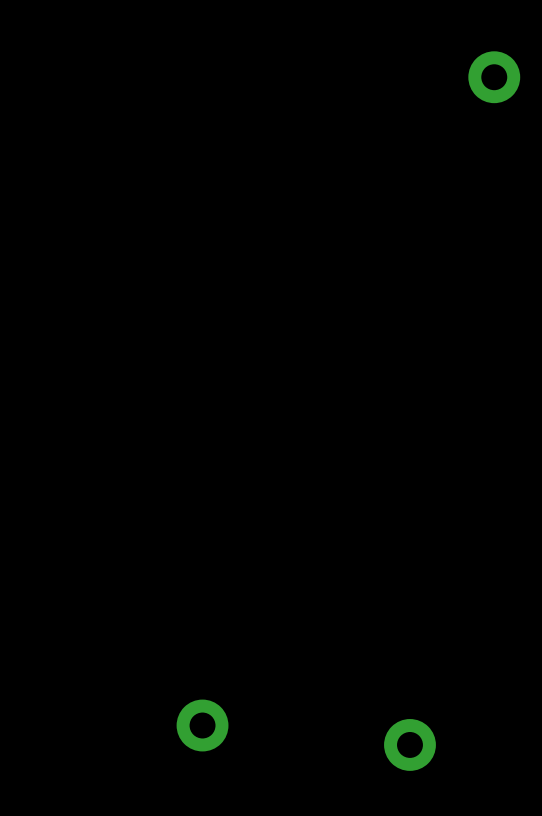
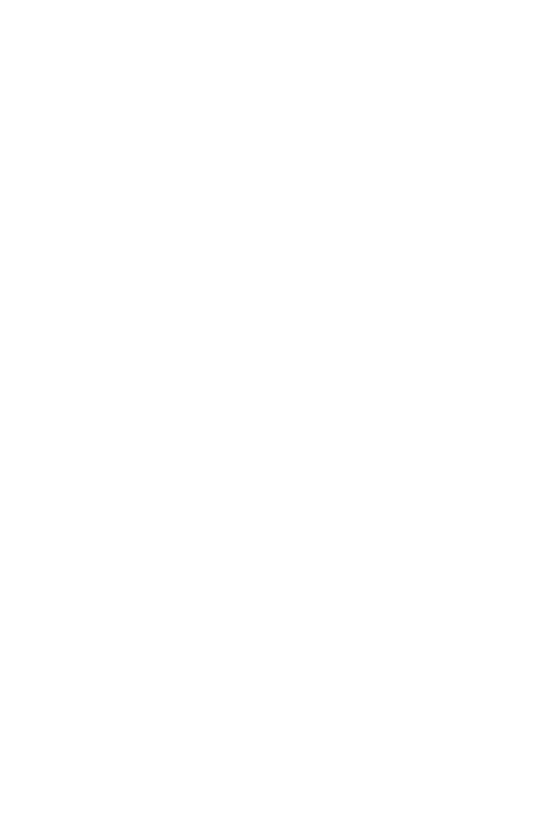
via: (494, 77) -> none
via: (202, 725) -> none
via: (409, 744) -> none

